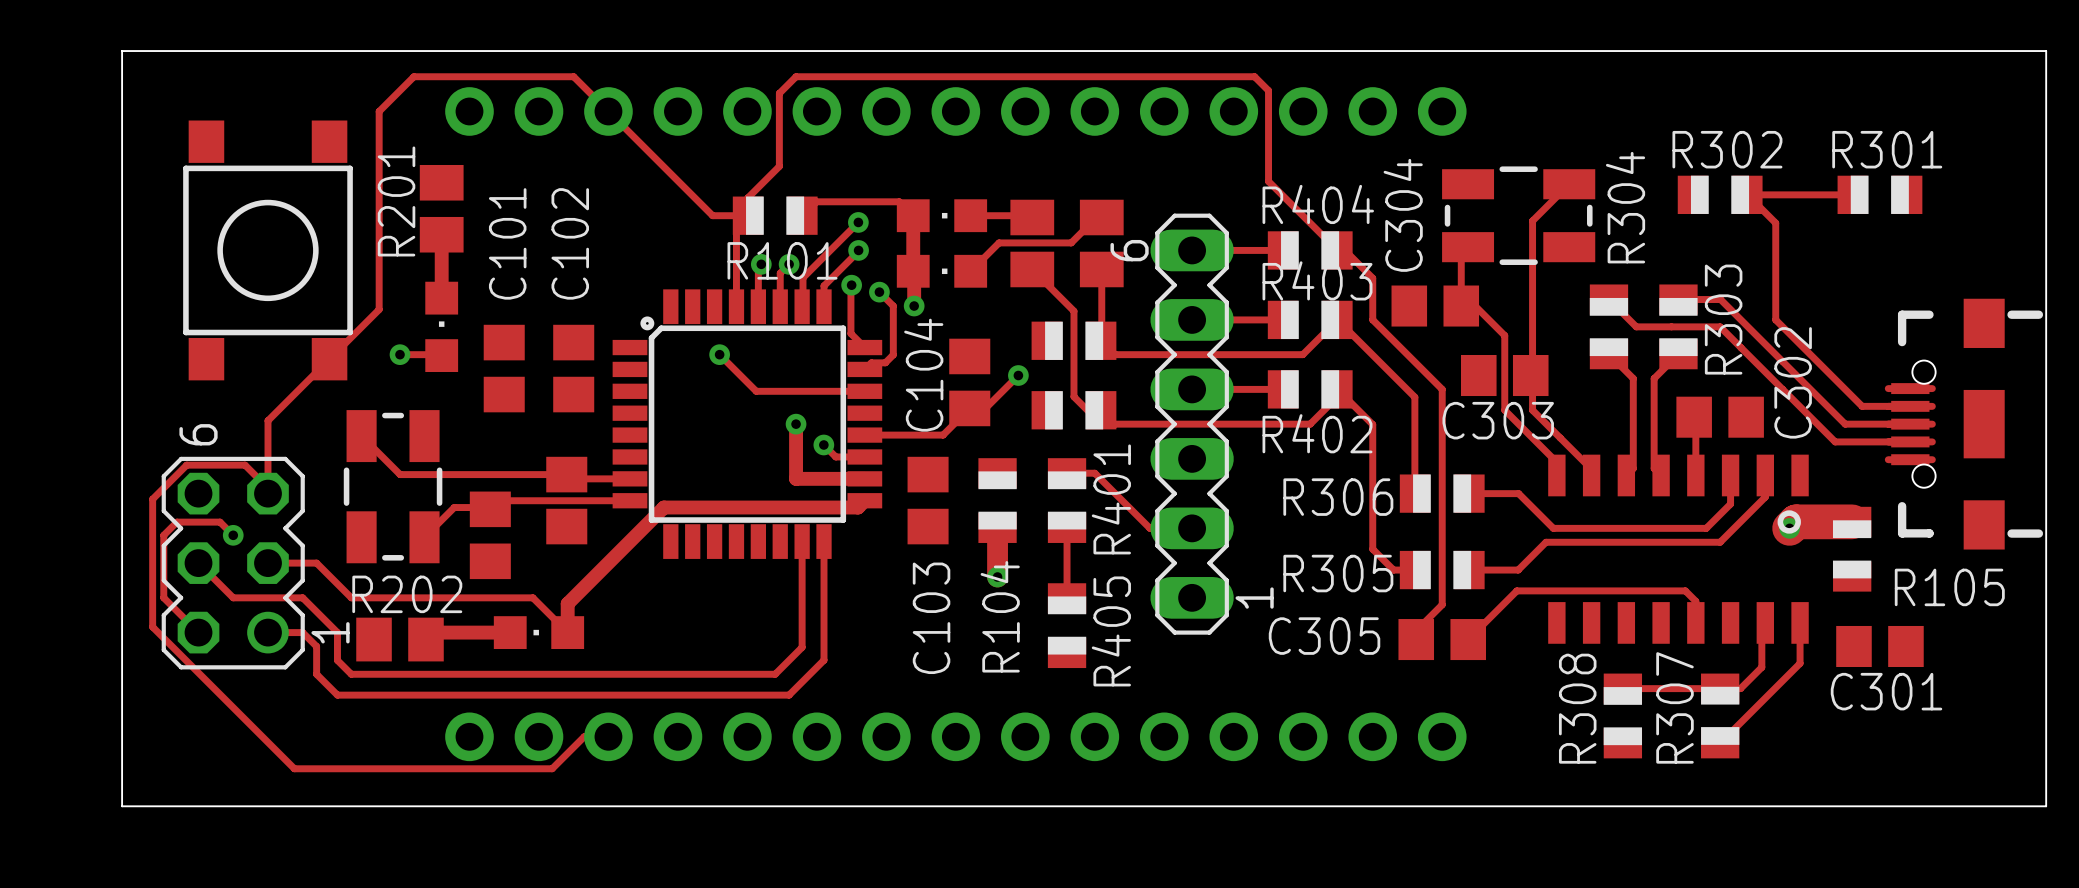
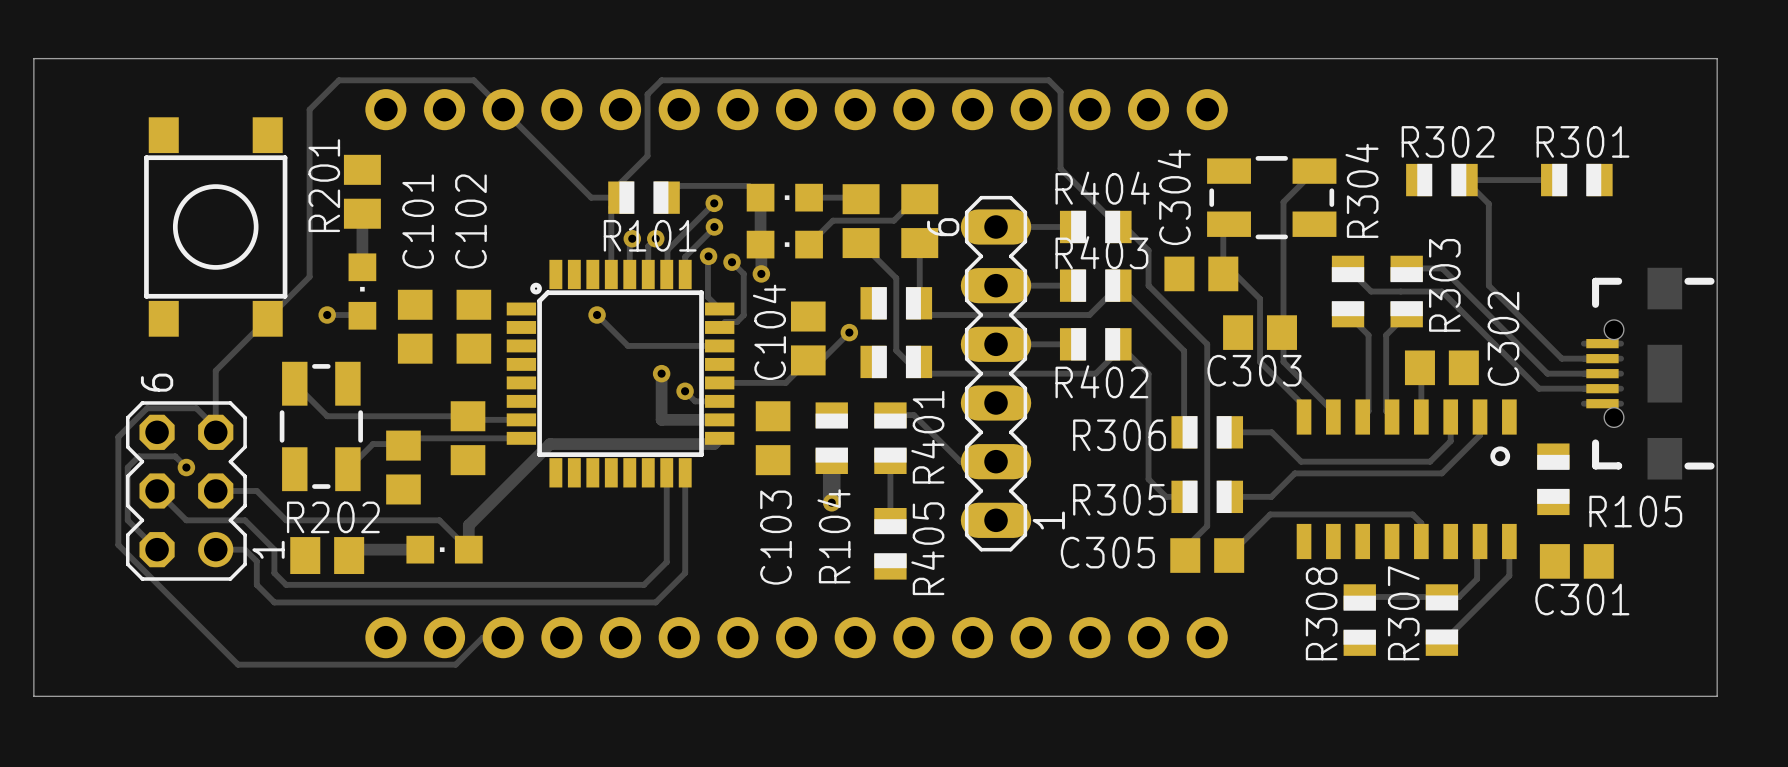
board edge: (122, 51) (122, 806) -> (92, 58) (33, 58) (33, 696) (92, 696)
track: (1852, 521) (1796, 521) (1789, 528) -> none
via: (1789, 528) -> none

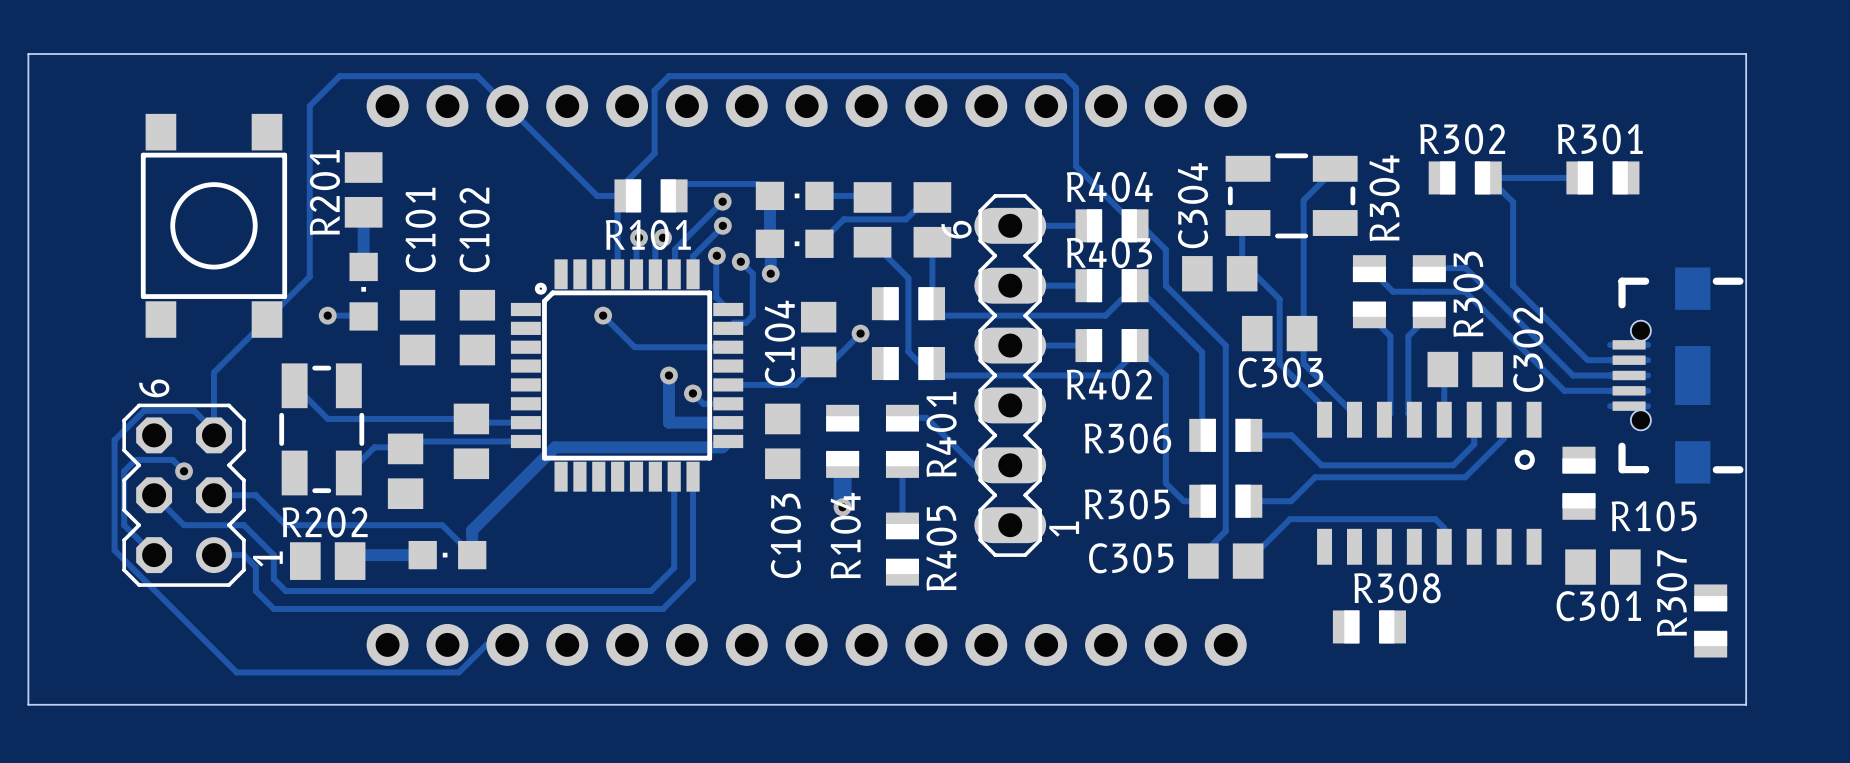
track: (1480, 541) (1477, 544) (1477, 579) (1459, 596) (1359, 596) -> none
track: (1509, 541) (1509, 575) (1441, 643) -> none
R307 name position: R307 (1403, 613) -> R307 (1671, 593)
R308 rotation: 0° (1359, 620) -> 90° clockwise (1369, 626)
R307 position: (1441, 620) -> (1710, 620)

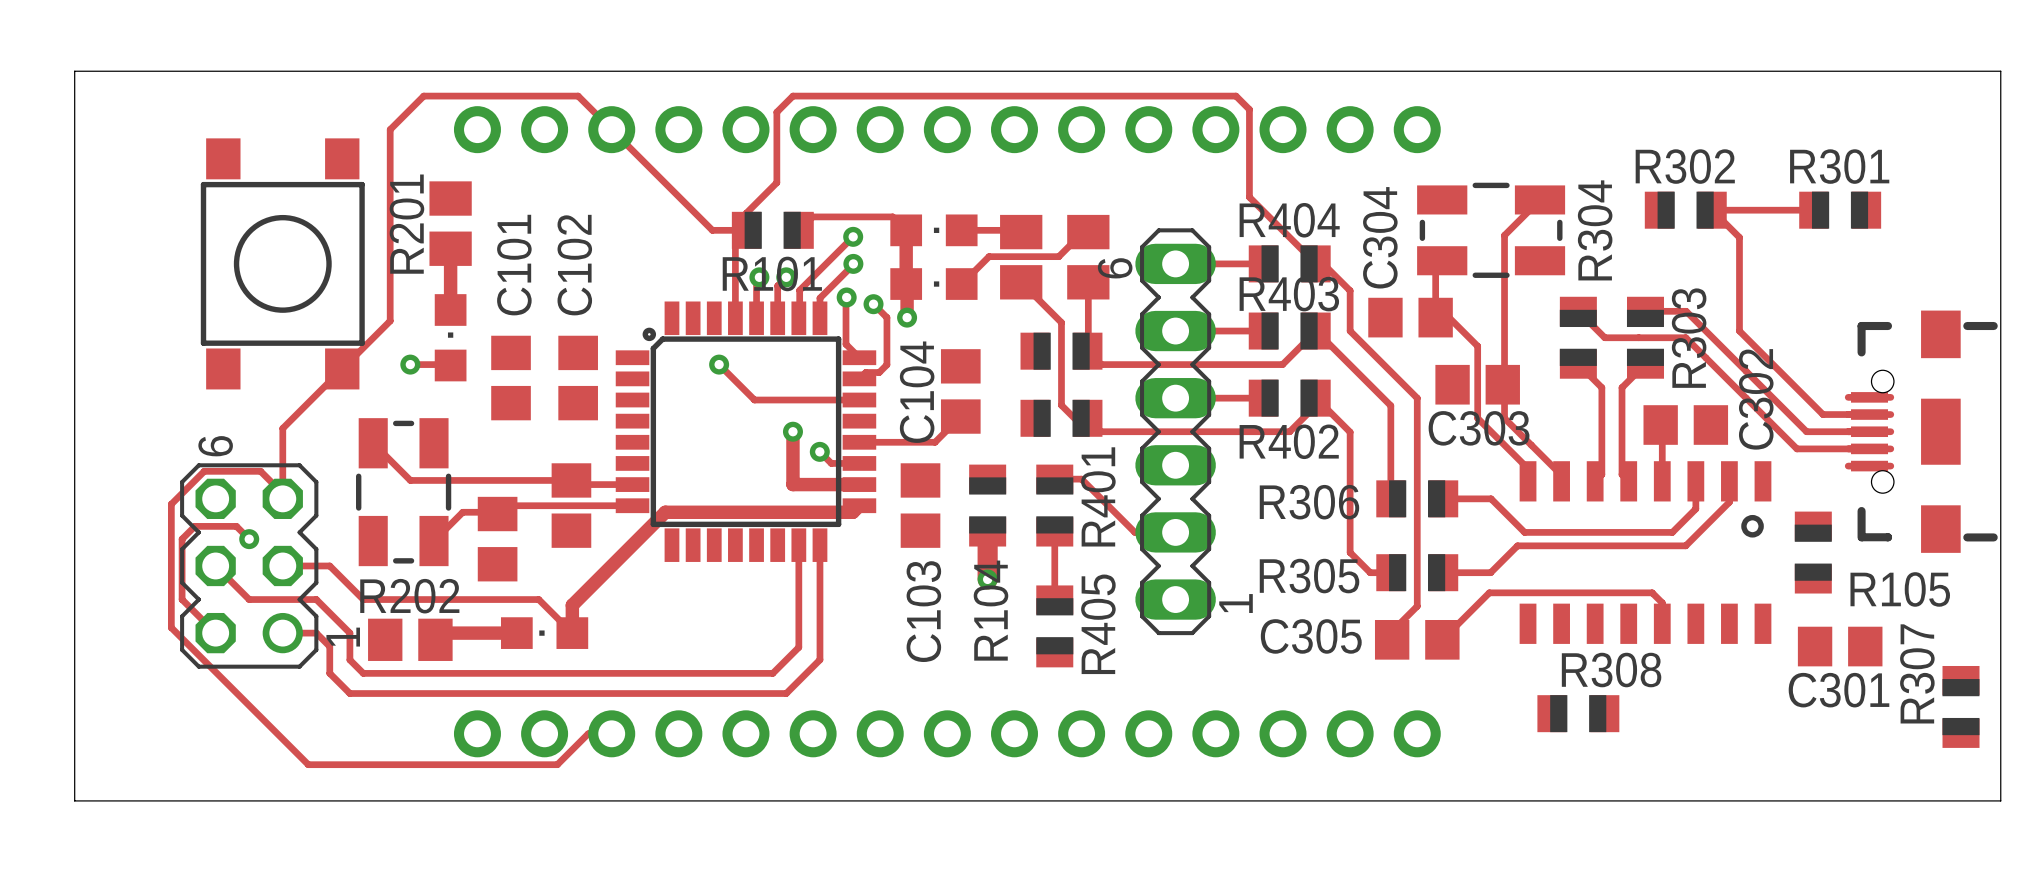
track: (860, 333) (832, 361) (818, 361) -> none
via: (860, 333) -> none

